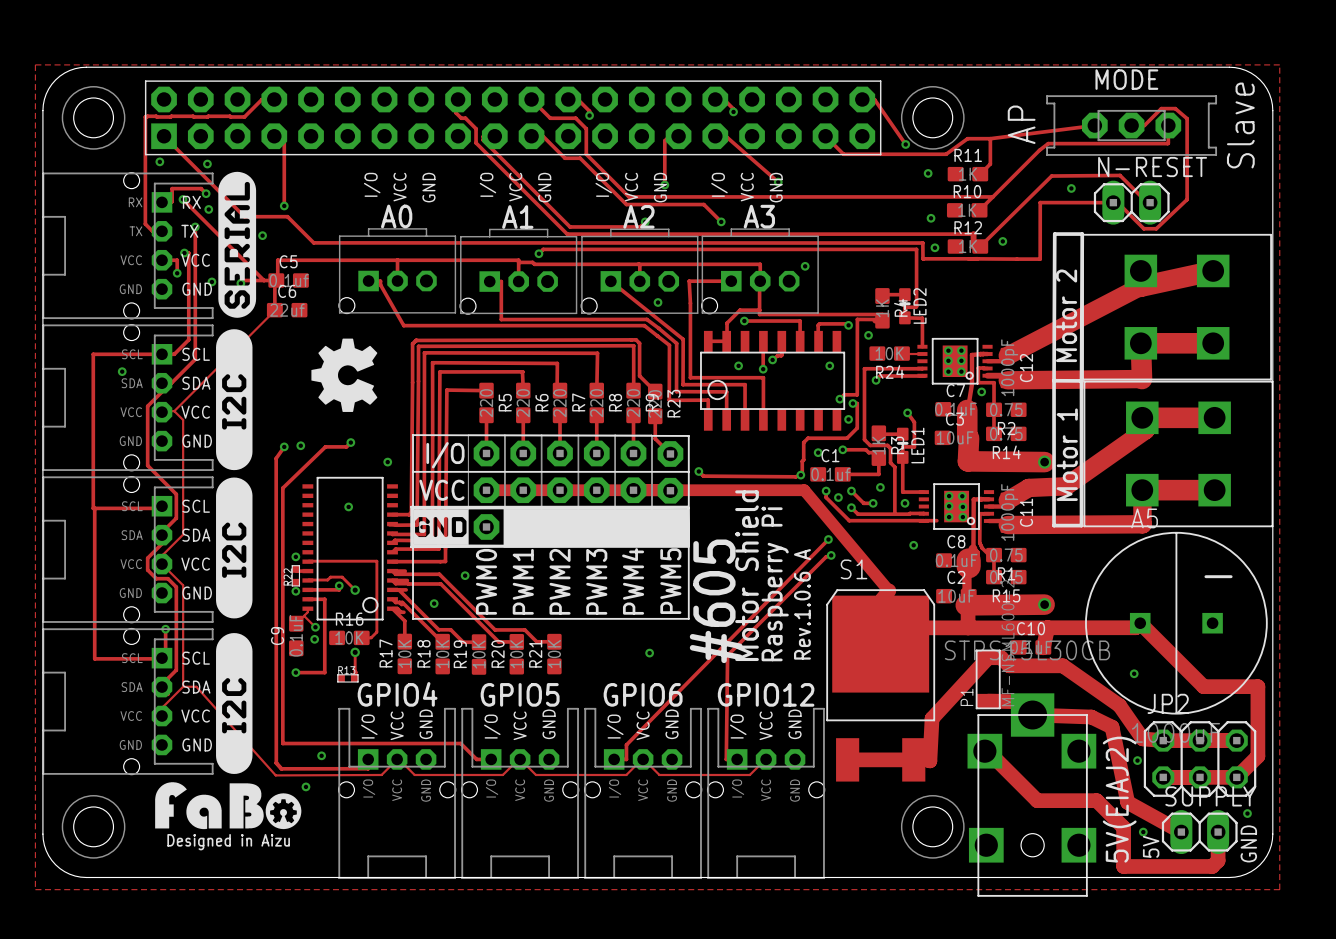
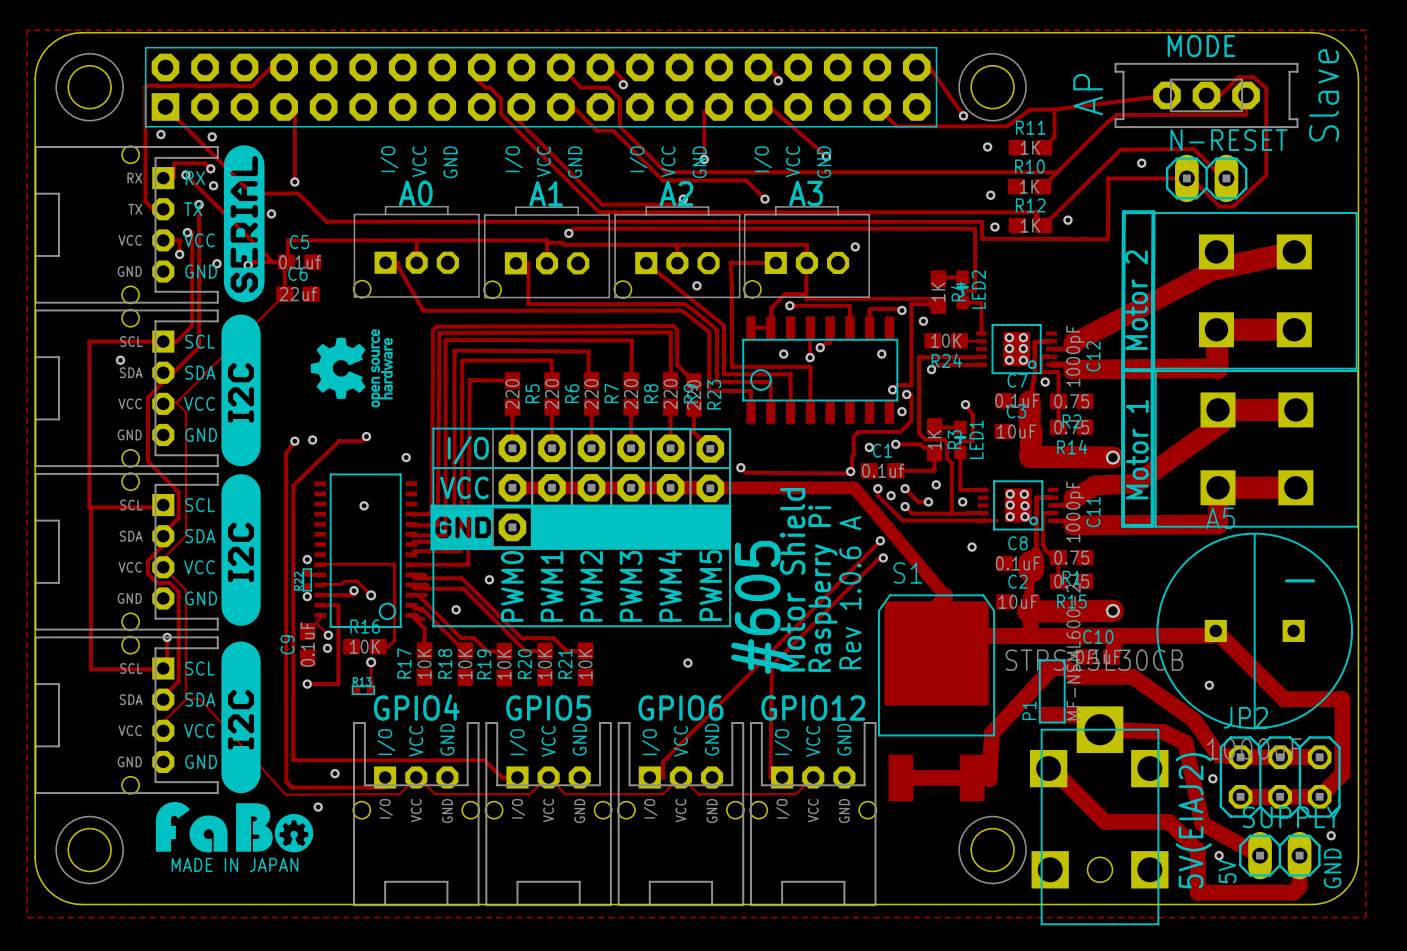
drawing shape: [311, 338, 378, 412] -> [310, 329, 393, 408]
text: Rev.1.0.6 A (802, 604) -> Rev 1.0.6 A (850, 592)
text: Designed in Aizu (228, 842) -> MADE IN JAPAN (234, 864)

